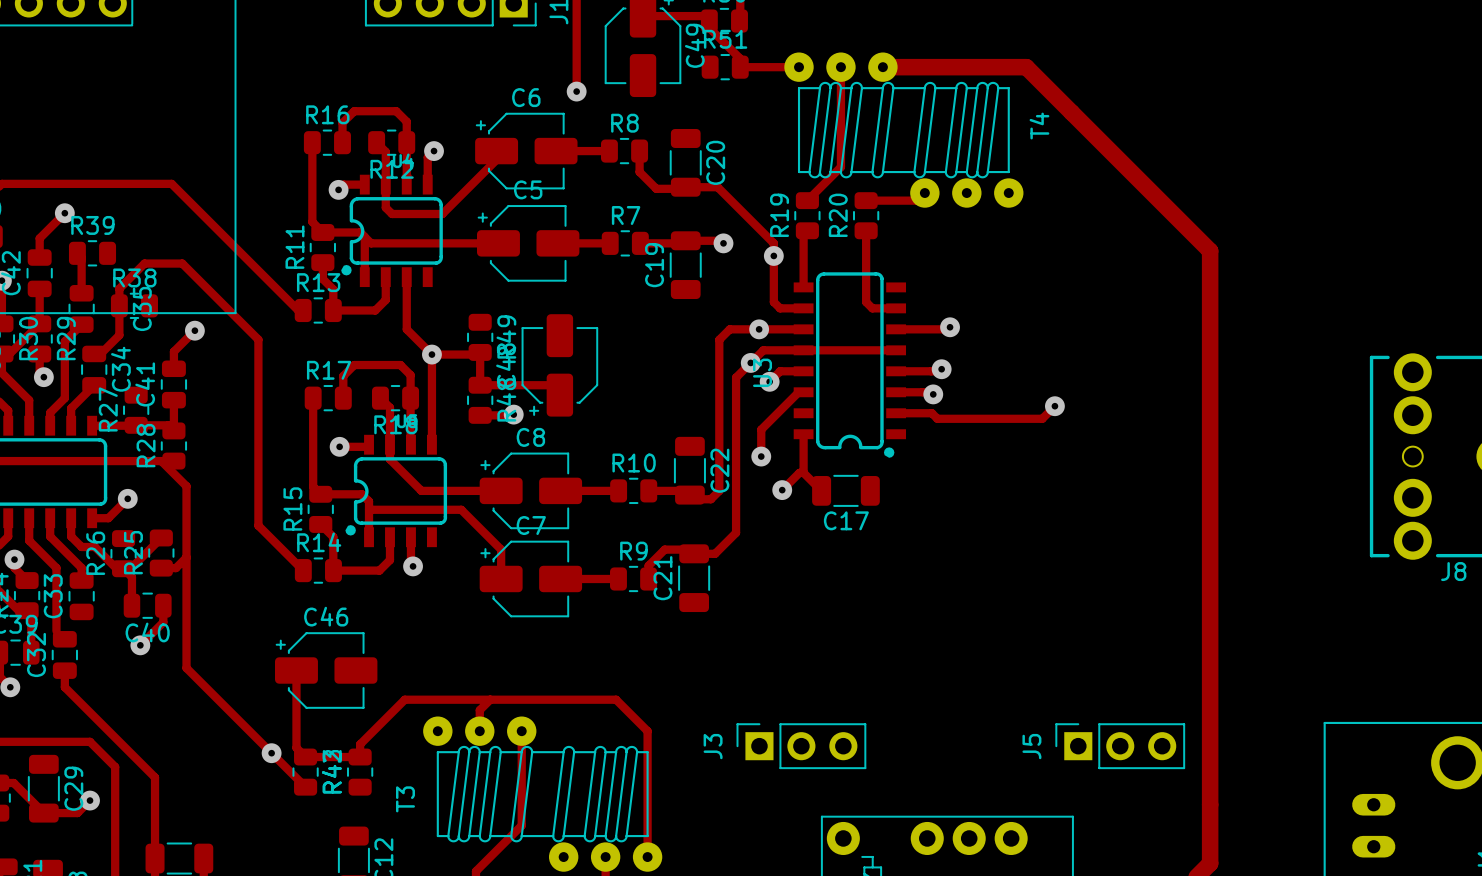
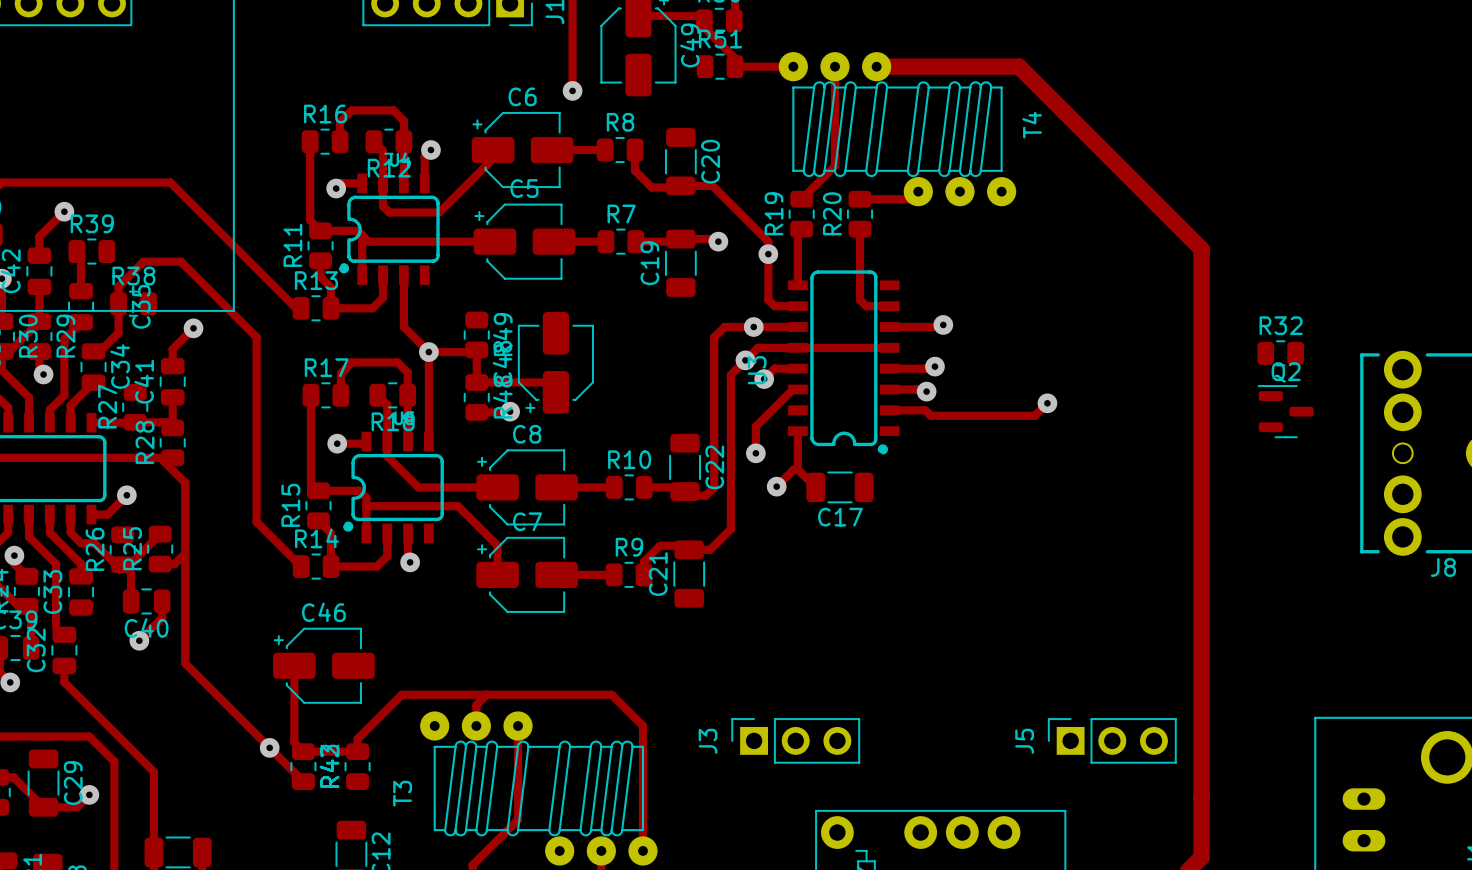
R32: none -> (1280, 353)
Q2: none -> (1285, 411)

